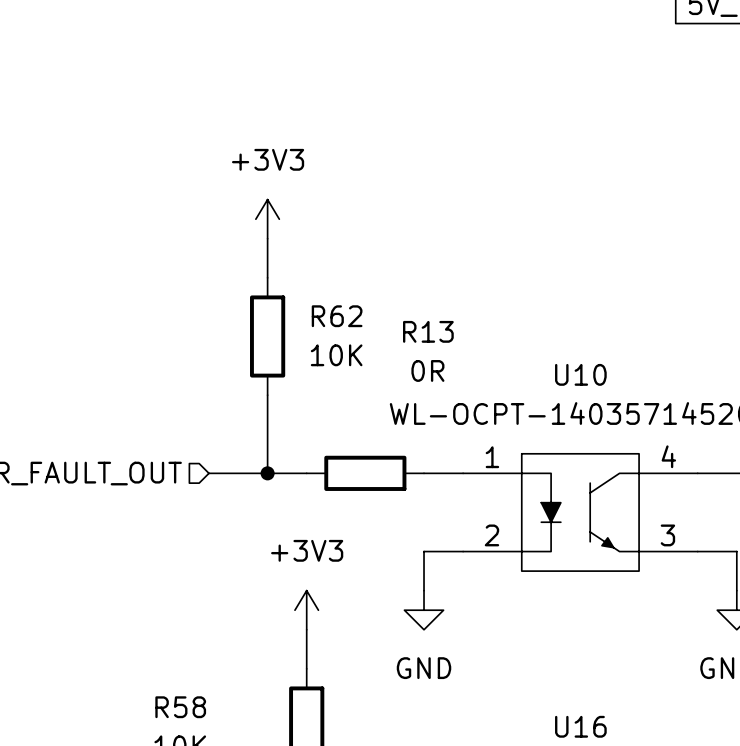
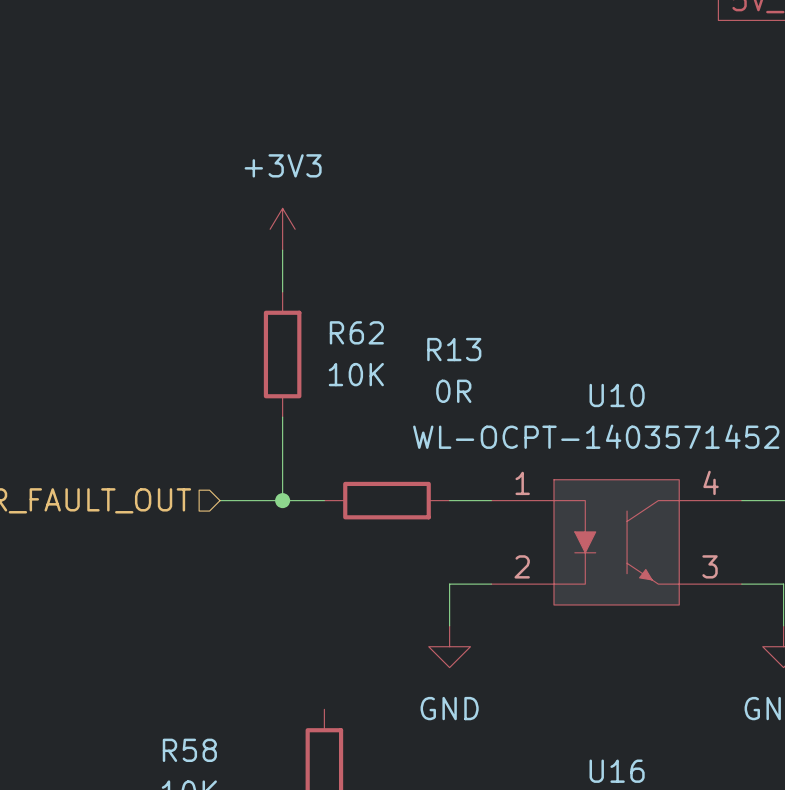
power symbol: +3V3 (306, 610) -> none
wire: (306, 629) (306, 668) -> none

